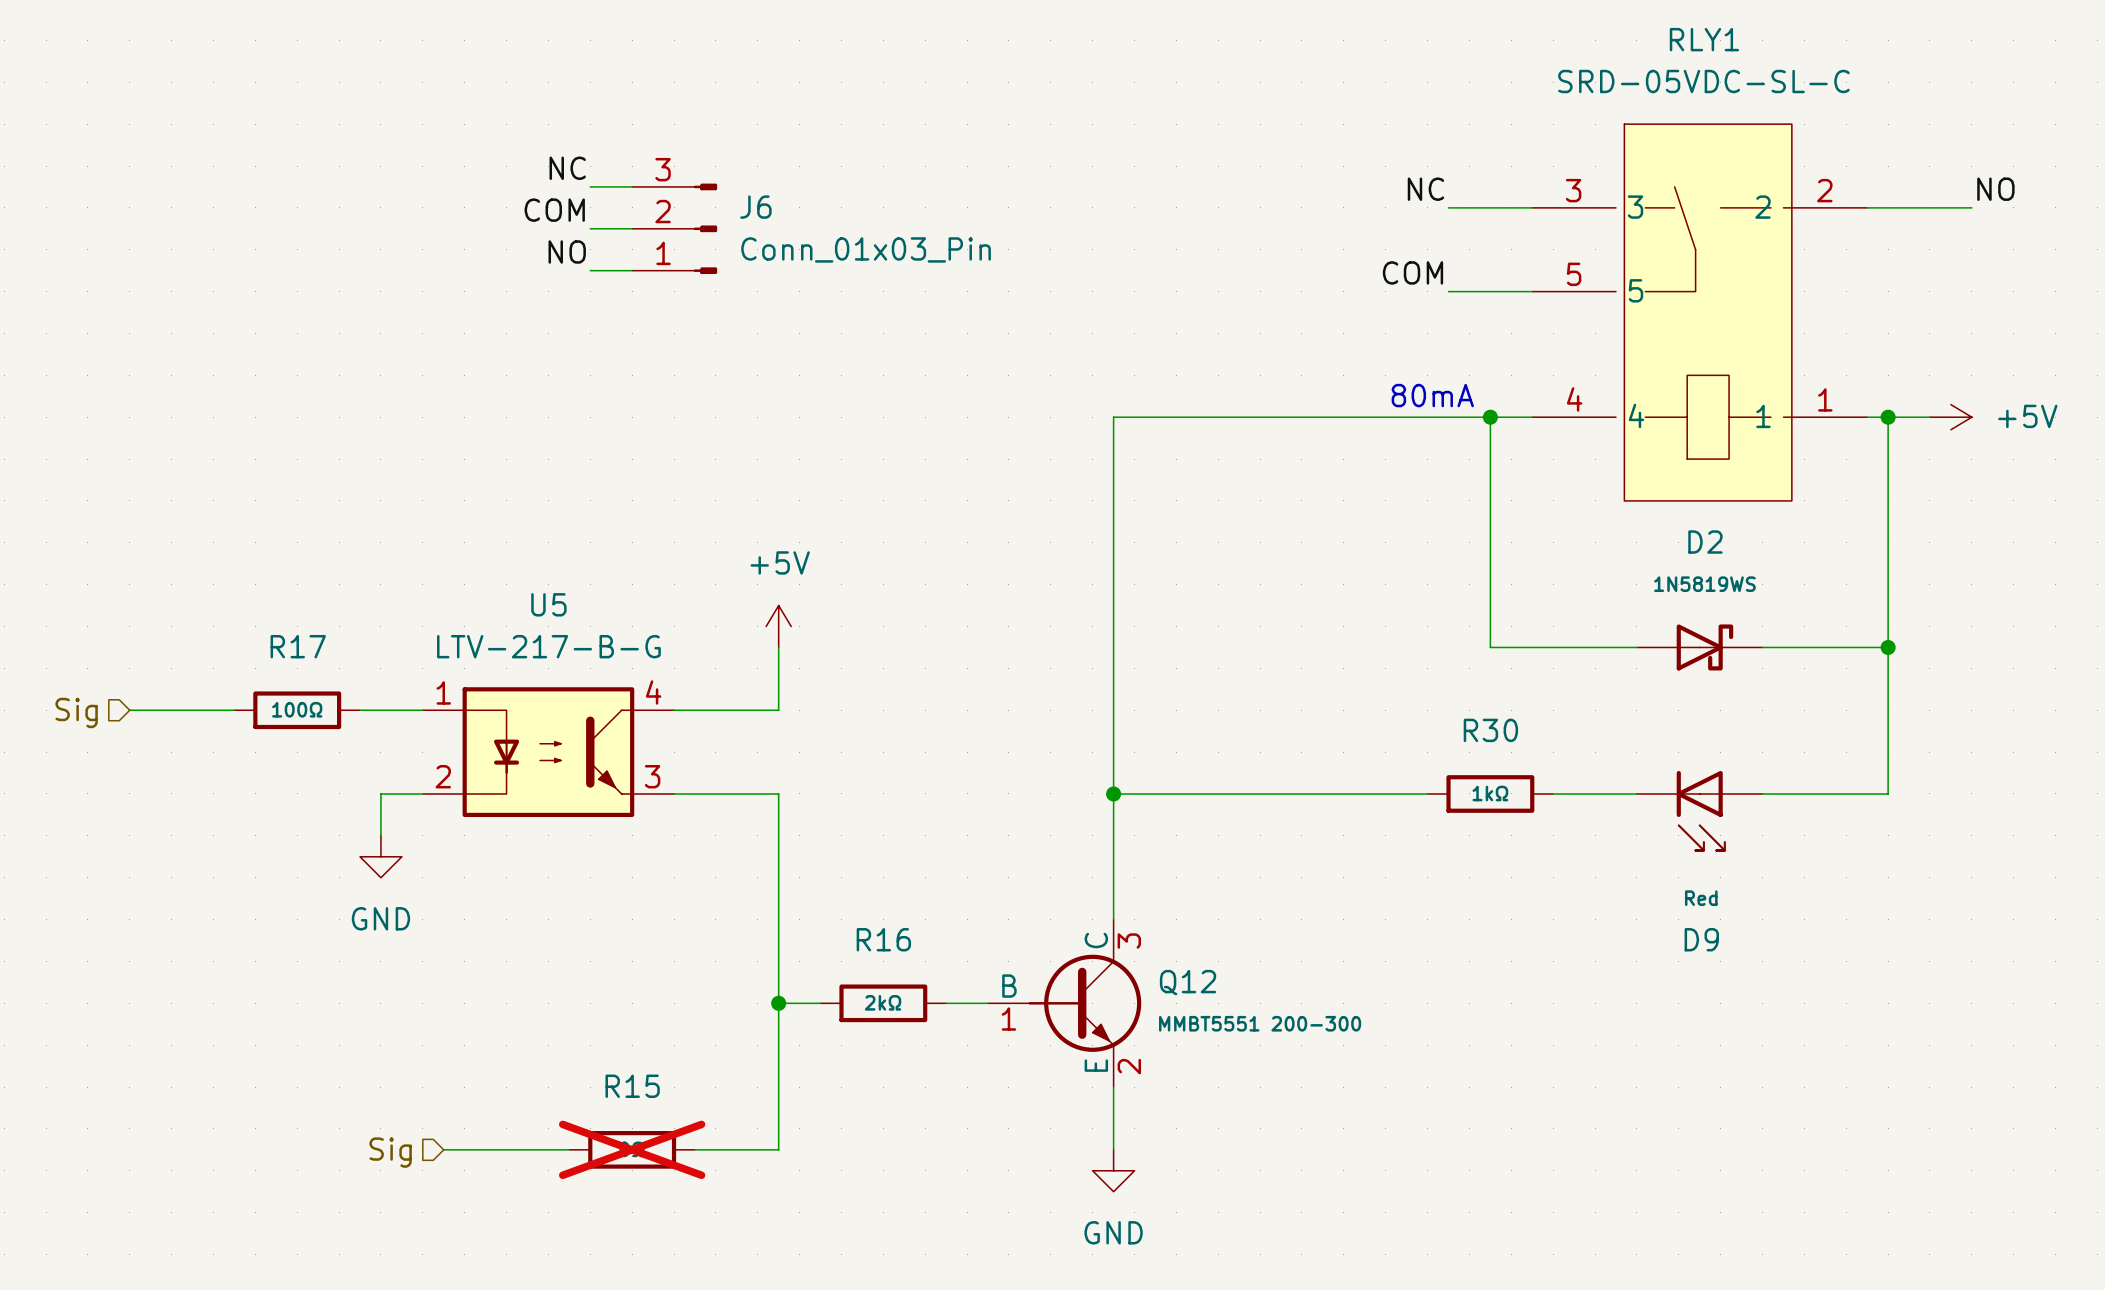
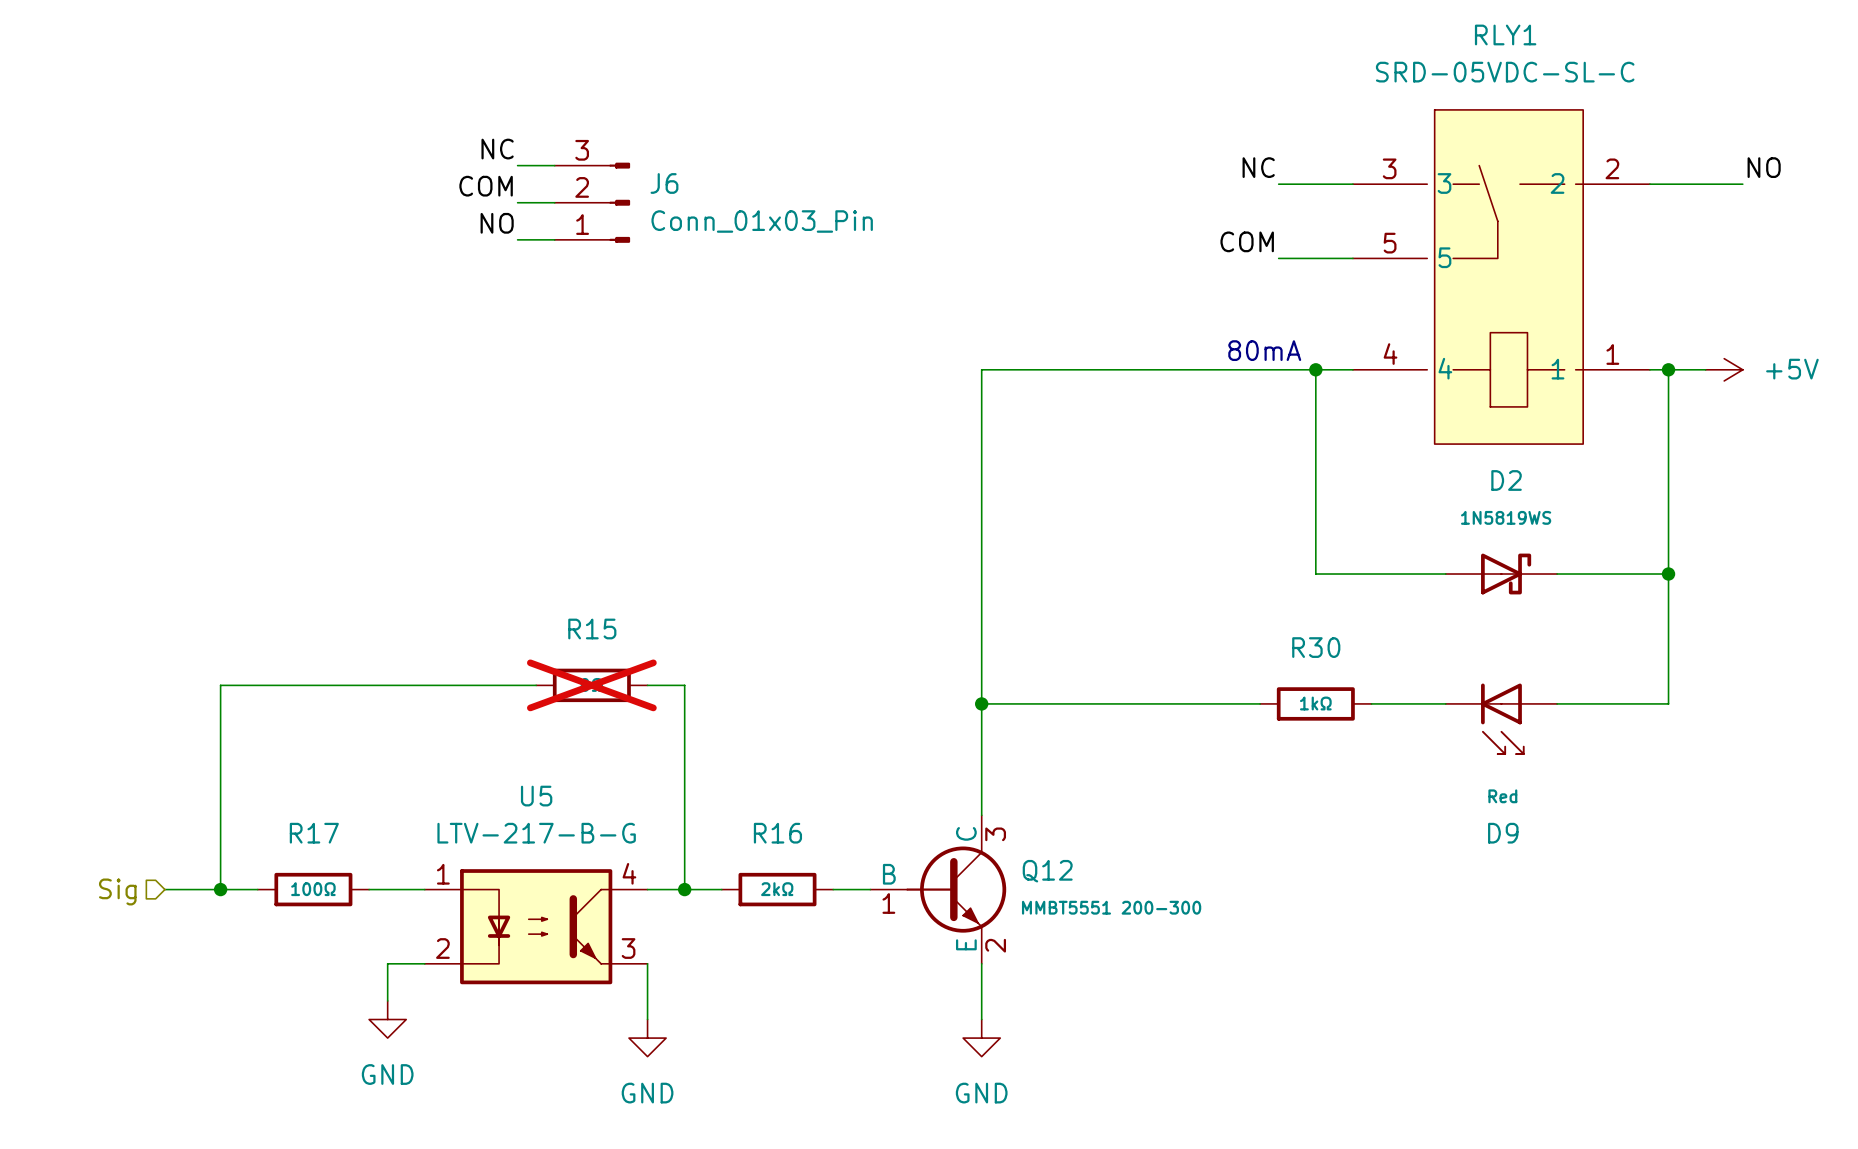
power symbol: +5V (778, 626) -> none
wire: (778, 647) (778, 710) (674, 710) -> none
wire: (129, 710) (234, 710) -> (164, 889) (257, 889)
R17 position: (297, 710) -> (313, 889)
wire: (360, 710) (422, 710) -> (369, 889) (424, 889)
hierarchical label: Sig (76, 712) -> none
U5 position: (548, 752) -> (536, 926)
wire: none -> (536, 685) (220, 685) (220, 889)
wire: (422, 793) (380, 793) (380, 835) -> (424, 963) (387, 963) (387, 1000)
wire: (674, 793) (778, 793) -> (647, 685) (684, 685) (684, 703)
power symbol: GND (380, 856) -> none
junction: none -> (220, 889)
wire: (778, 1003) (778, 1149) (694, 1149) -> (684, 889) (647, 889)
hierarchical label: none -> Sig (117, 891)
wire: none -> (647, 963) (647, 1019)
wire: (443, 1149) (569, 1149) -> none
power symbol: none -> GND (387, 1019)
R15 position: (632, 1149) -> (591, 685)
hierarchical label: Sig (390, 1152) -> none
power symbol: none -> GND (647, 1038)

